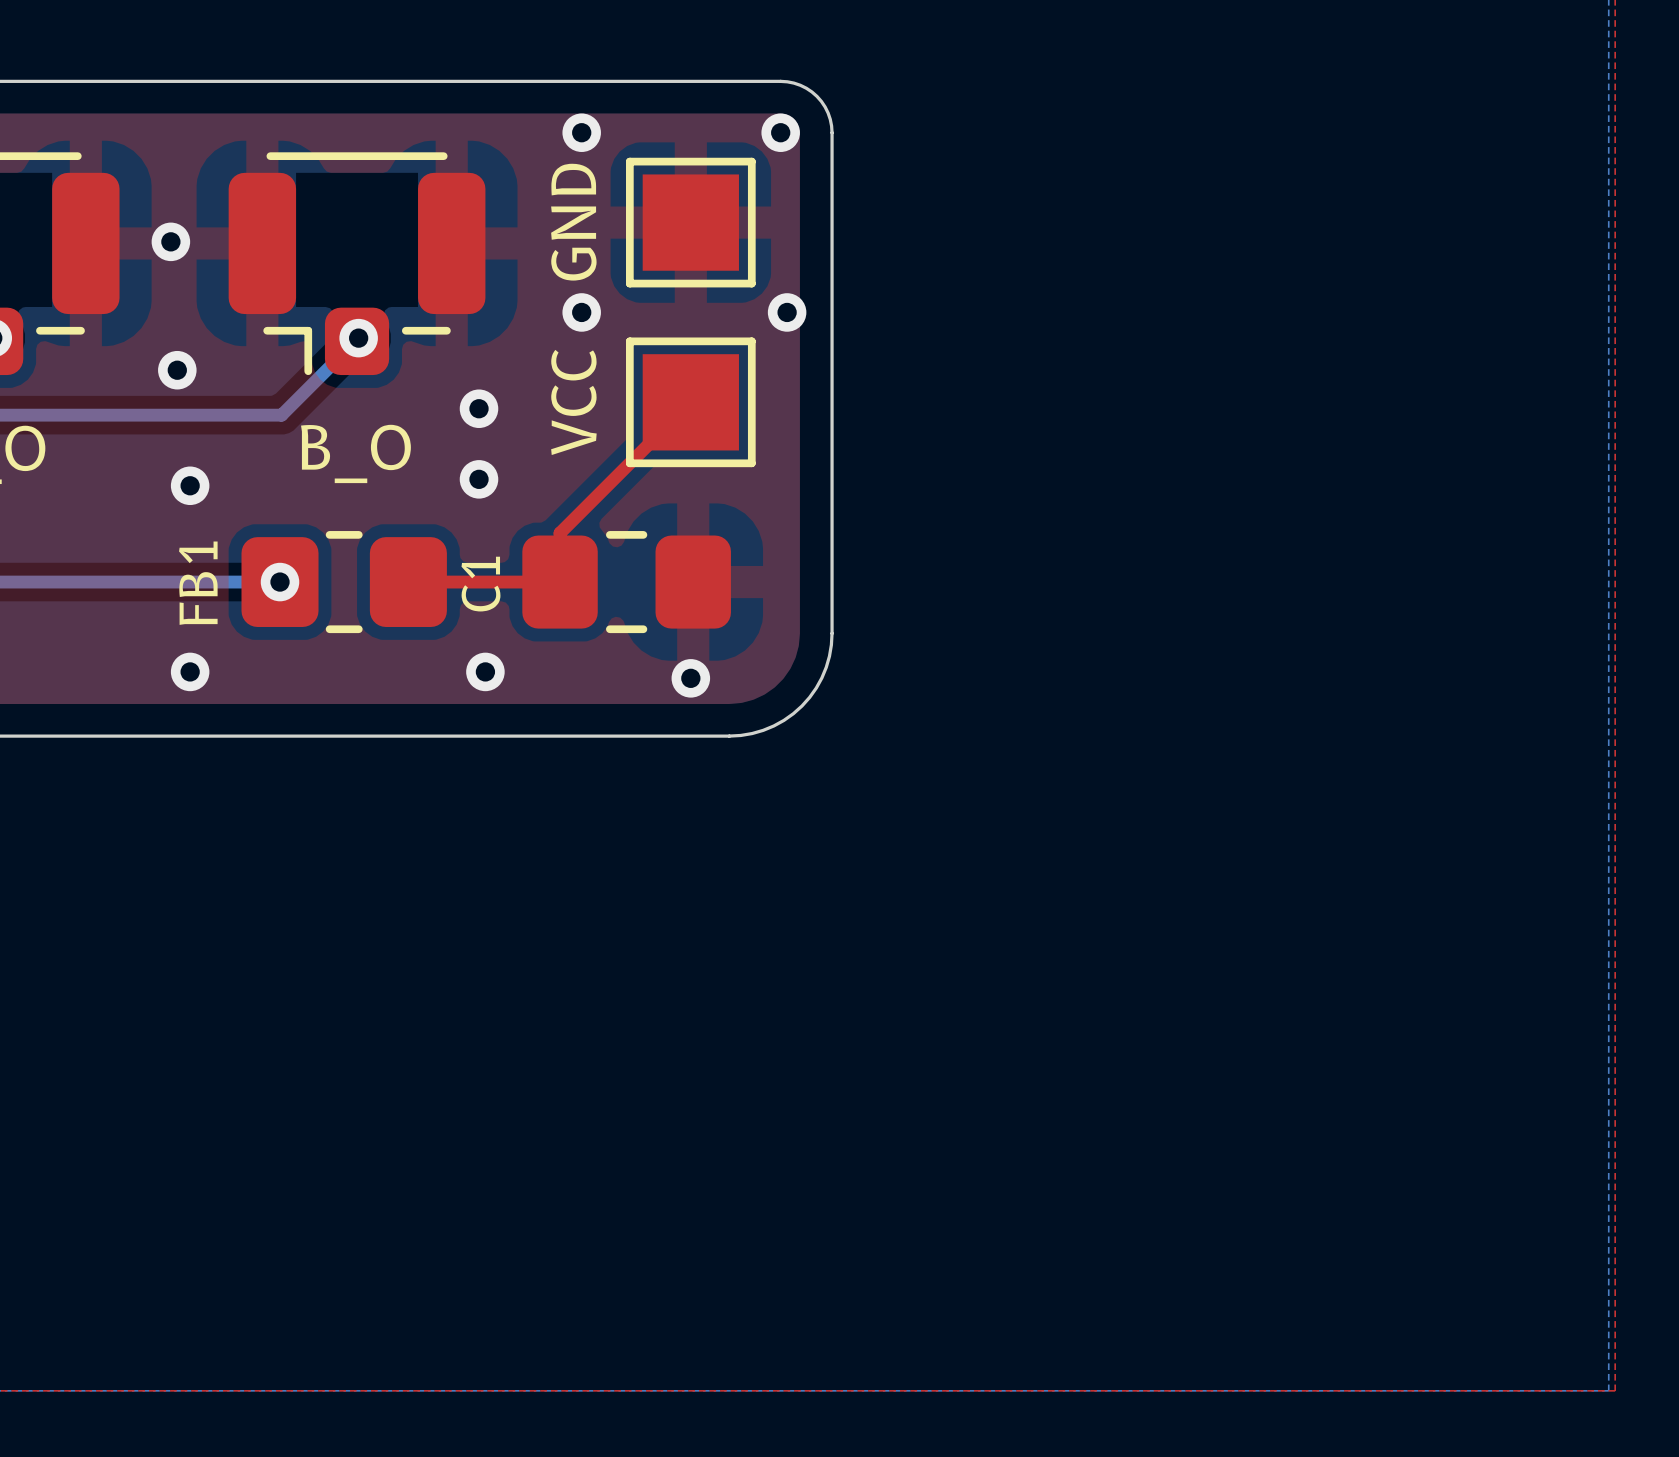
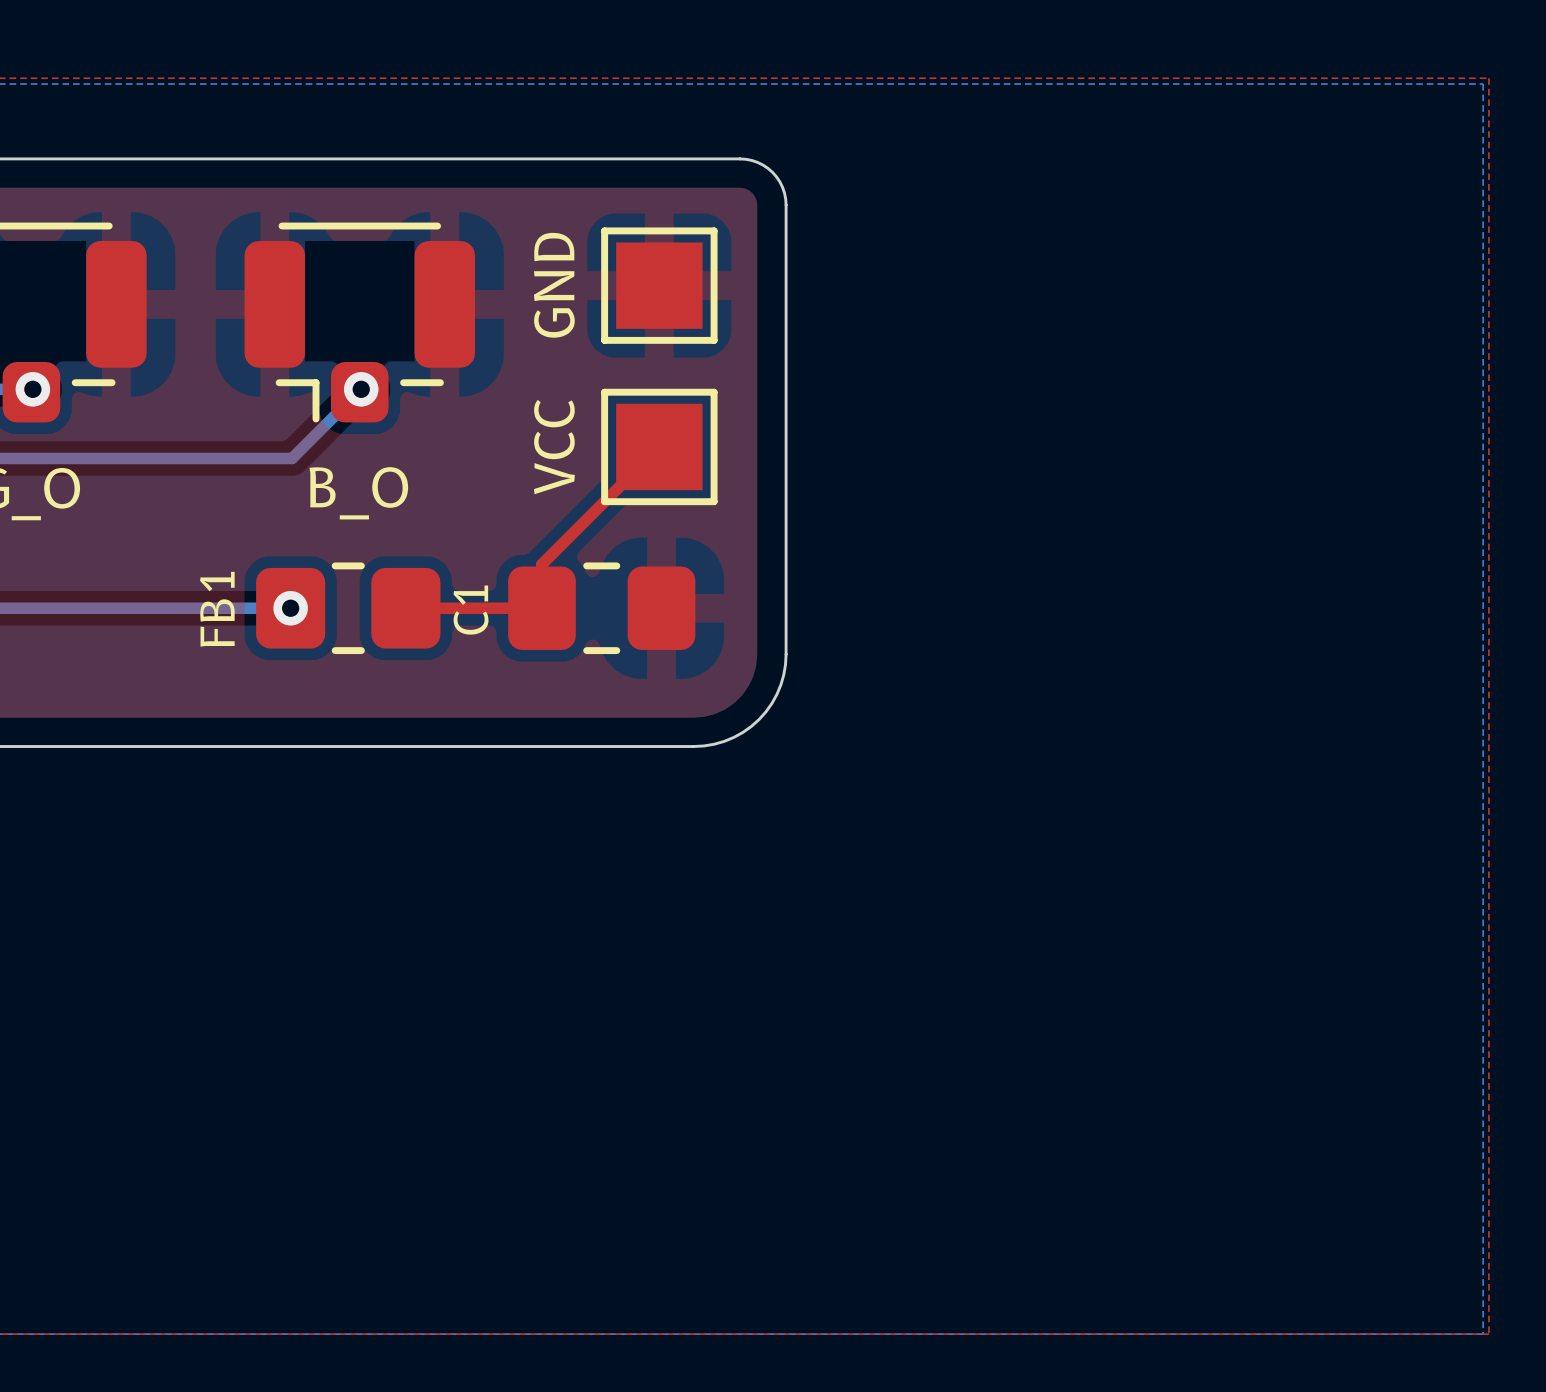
via: (581, 132) -> none
via: (780, 132) -> none
via: (170, 241) -> none
via: (581, 312) -> none
via: (787, 312) -> none
via: (177, 370) -> none
via: (479, 408) -> none
via: (479, 479) -> none
via: (190, 485) -> none
via: (190, 671) -> none
via: (485, 671) -> none
via: (690, 678) -> none

